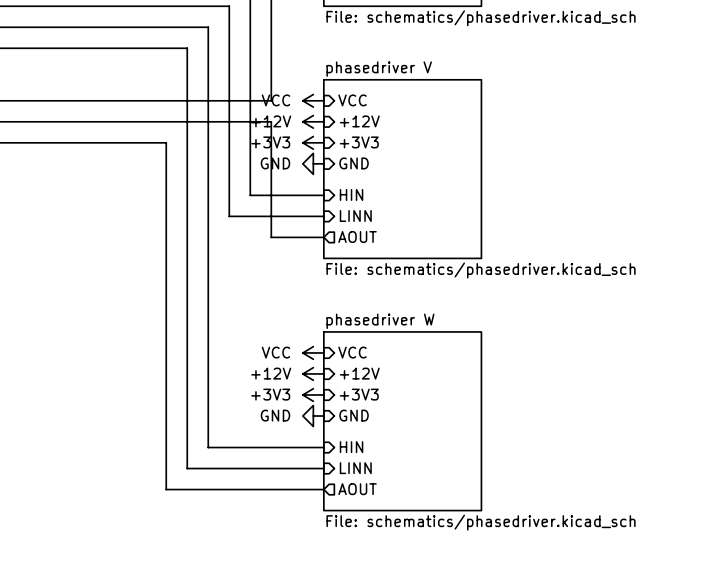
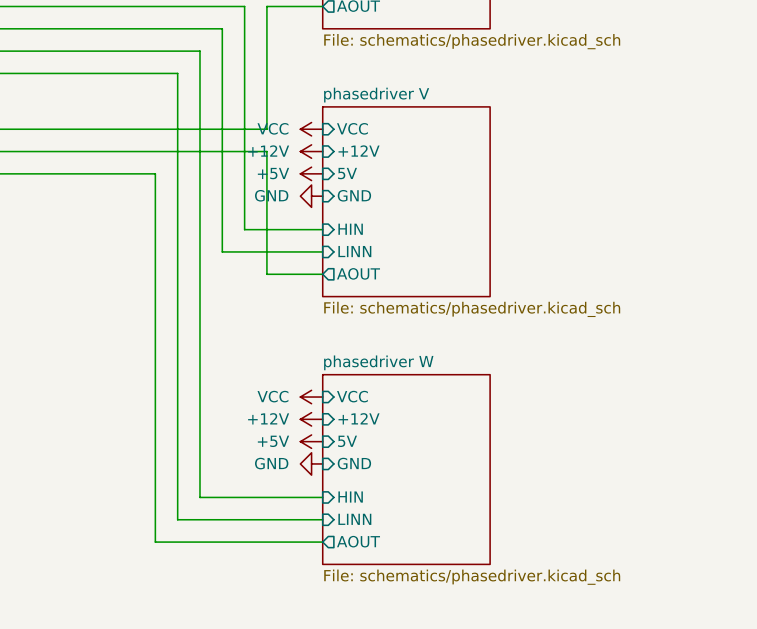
power symbol: +3V3 (313, 142) -> +5V (311, 173)
sheet pin: +3V3 (359, 142) -> 5V (347, 173)
power symbol: +3V3 (313, 394) -> +5V (311, 441)
sheet pin: +3V3 (359, 394) -> 5V (347, 441)

